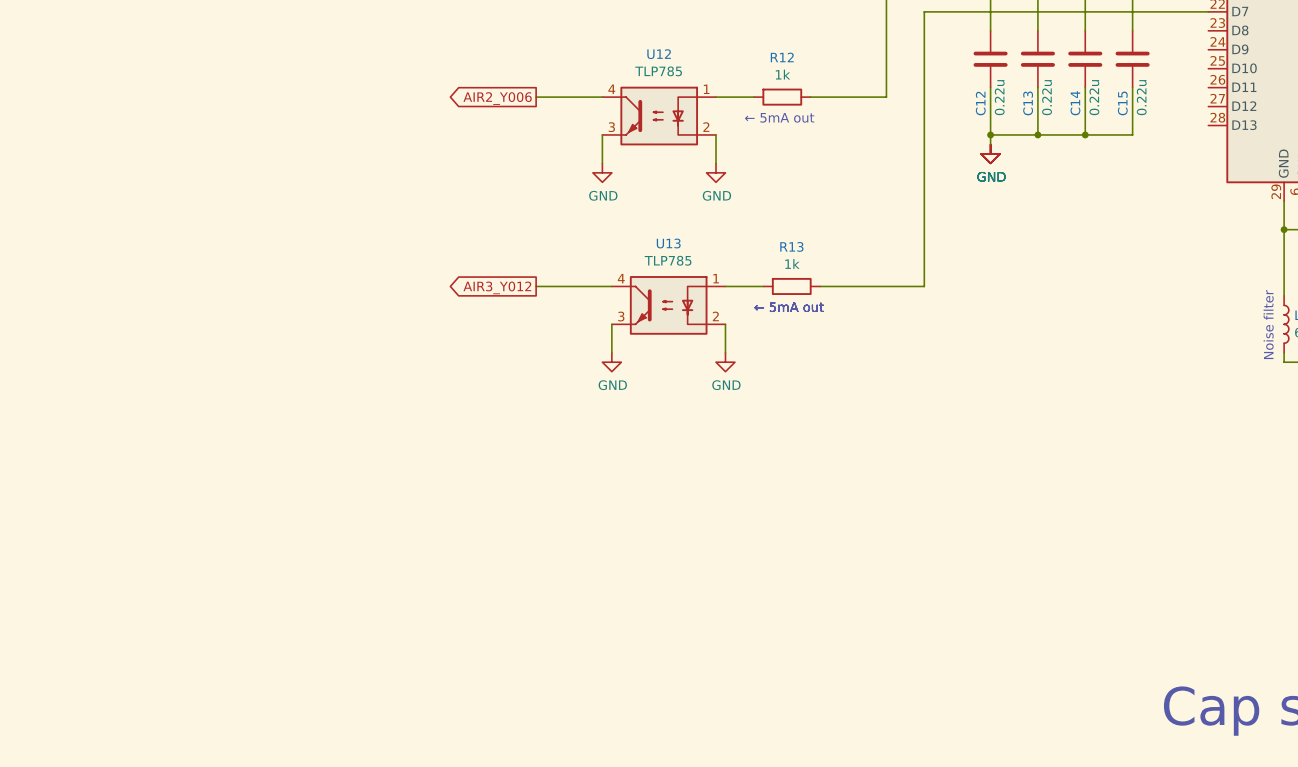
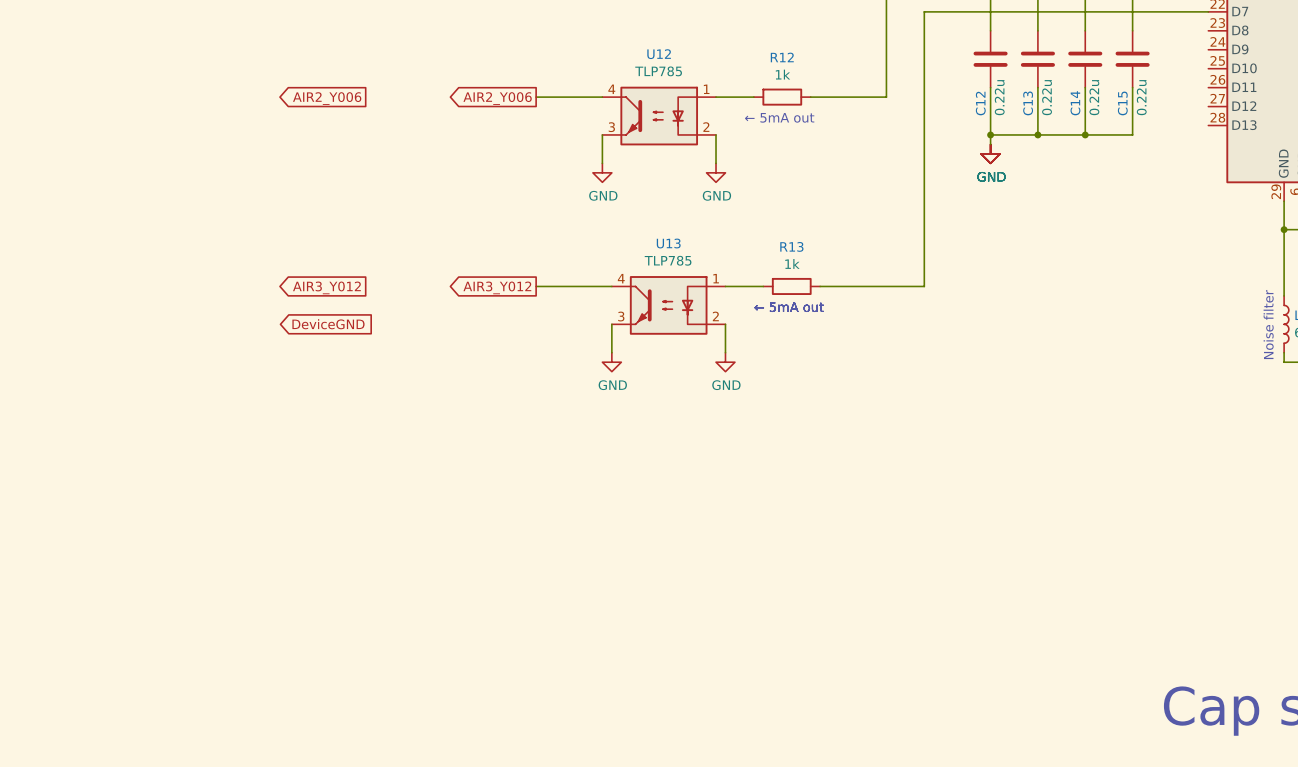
global label: none -> AIR2_Y006 (327, 98)
global label: none -> AIR3_Y012 (326, 287)
global label: none -> DeviceGND (328, 324)

